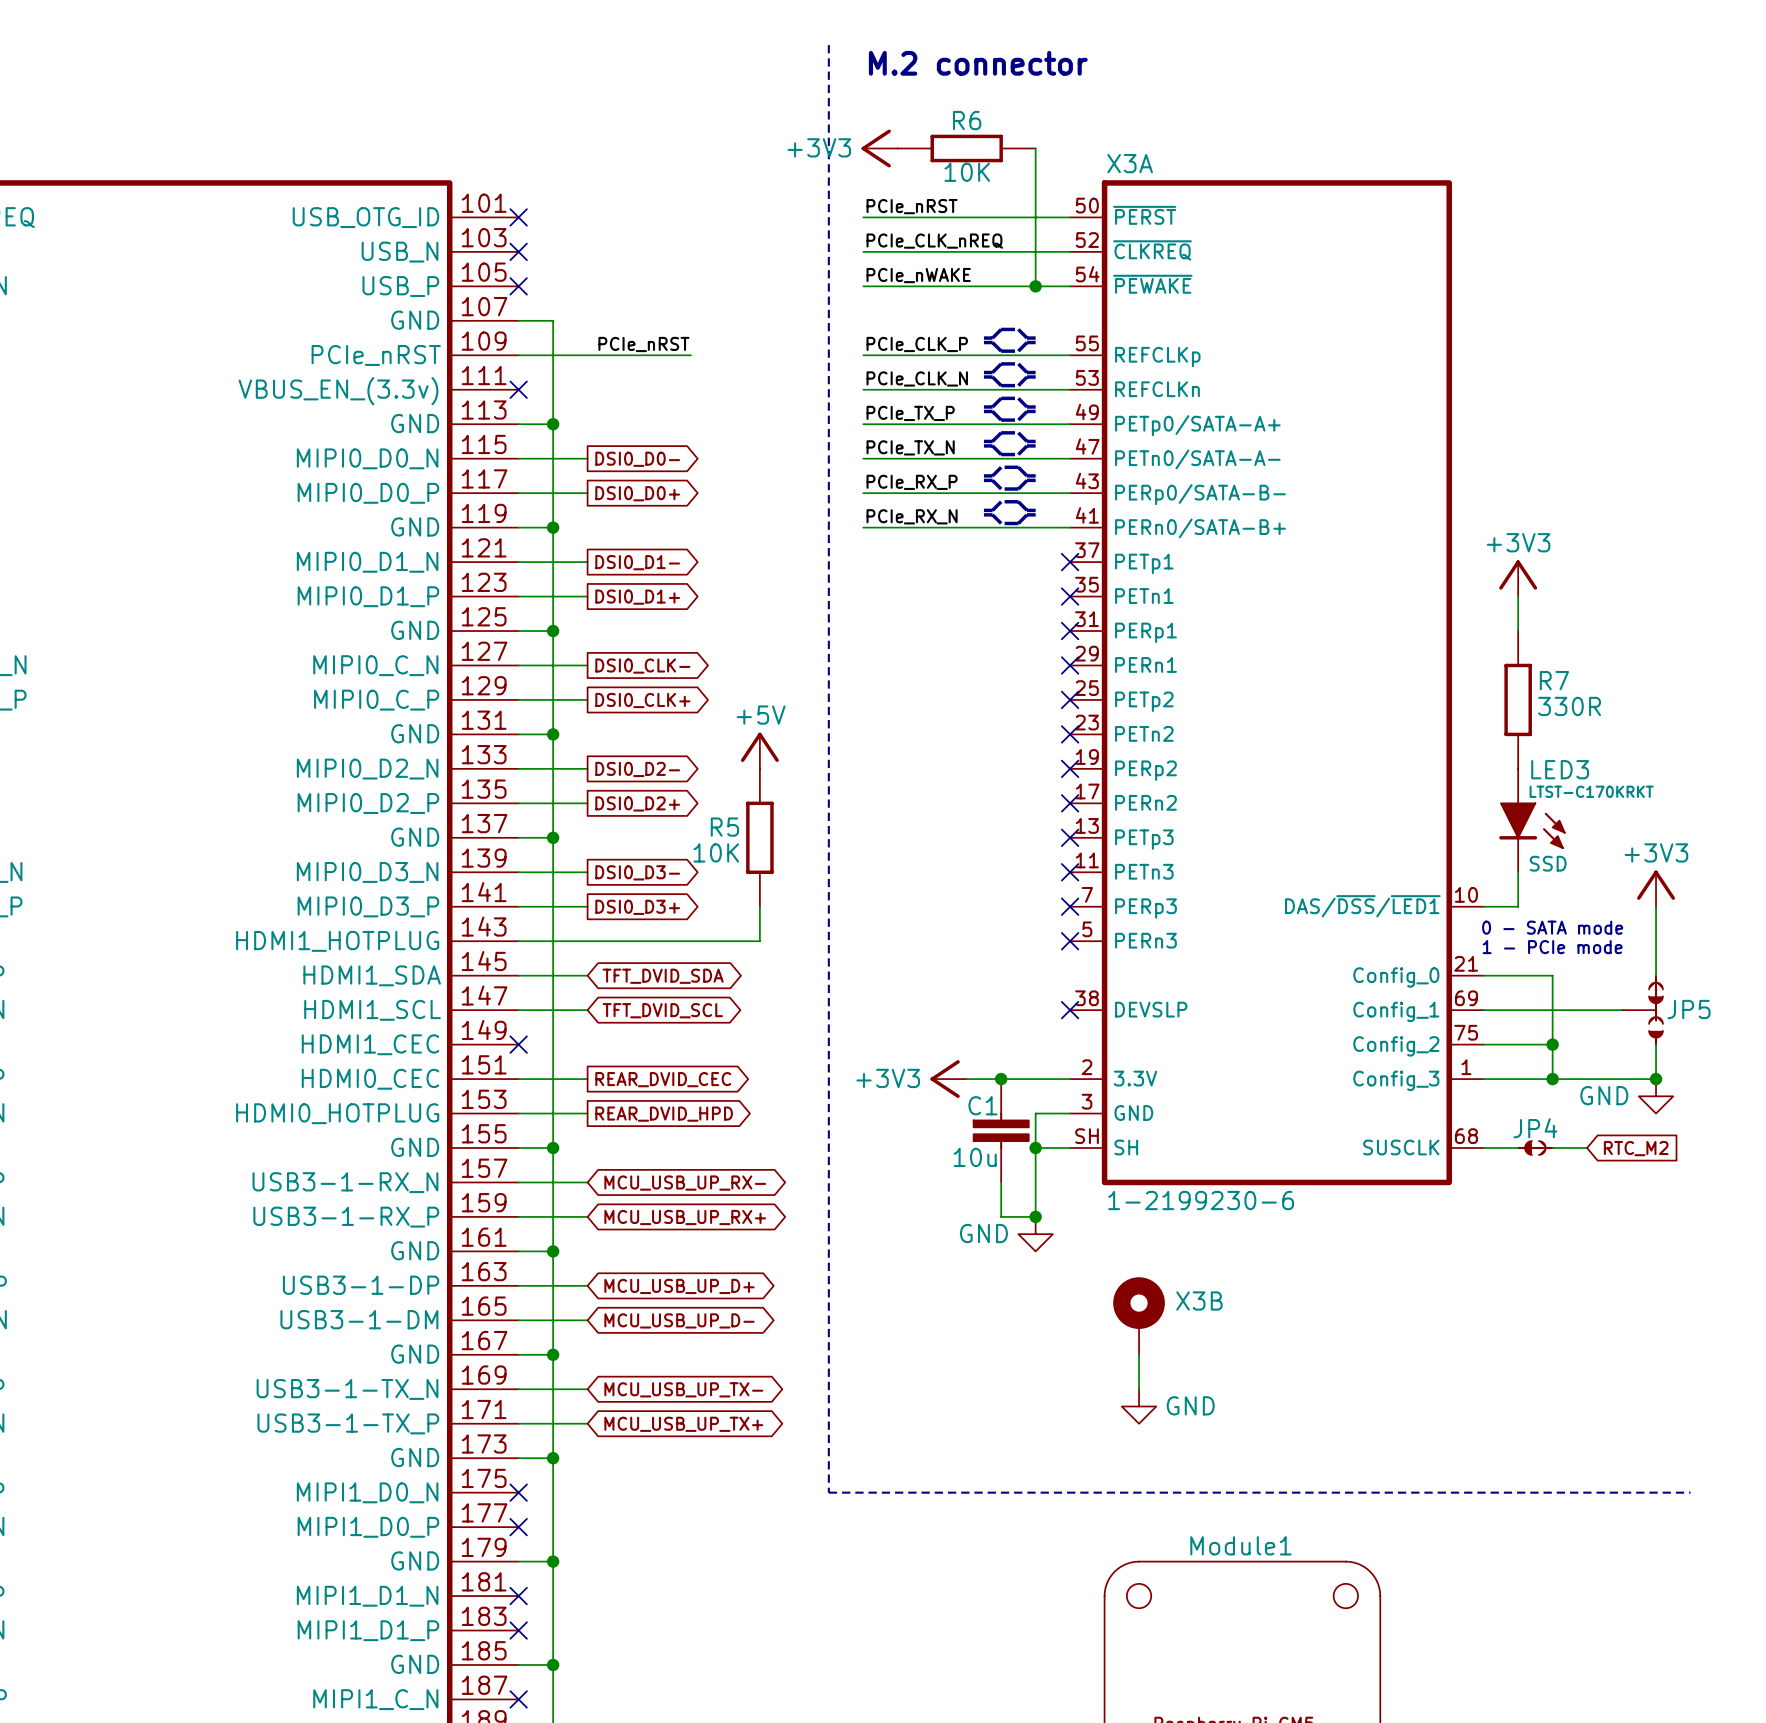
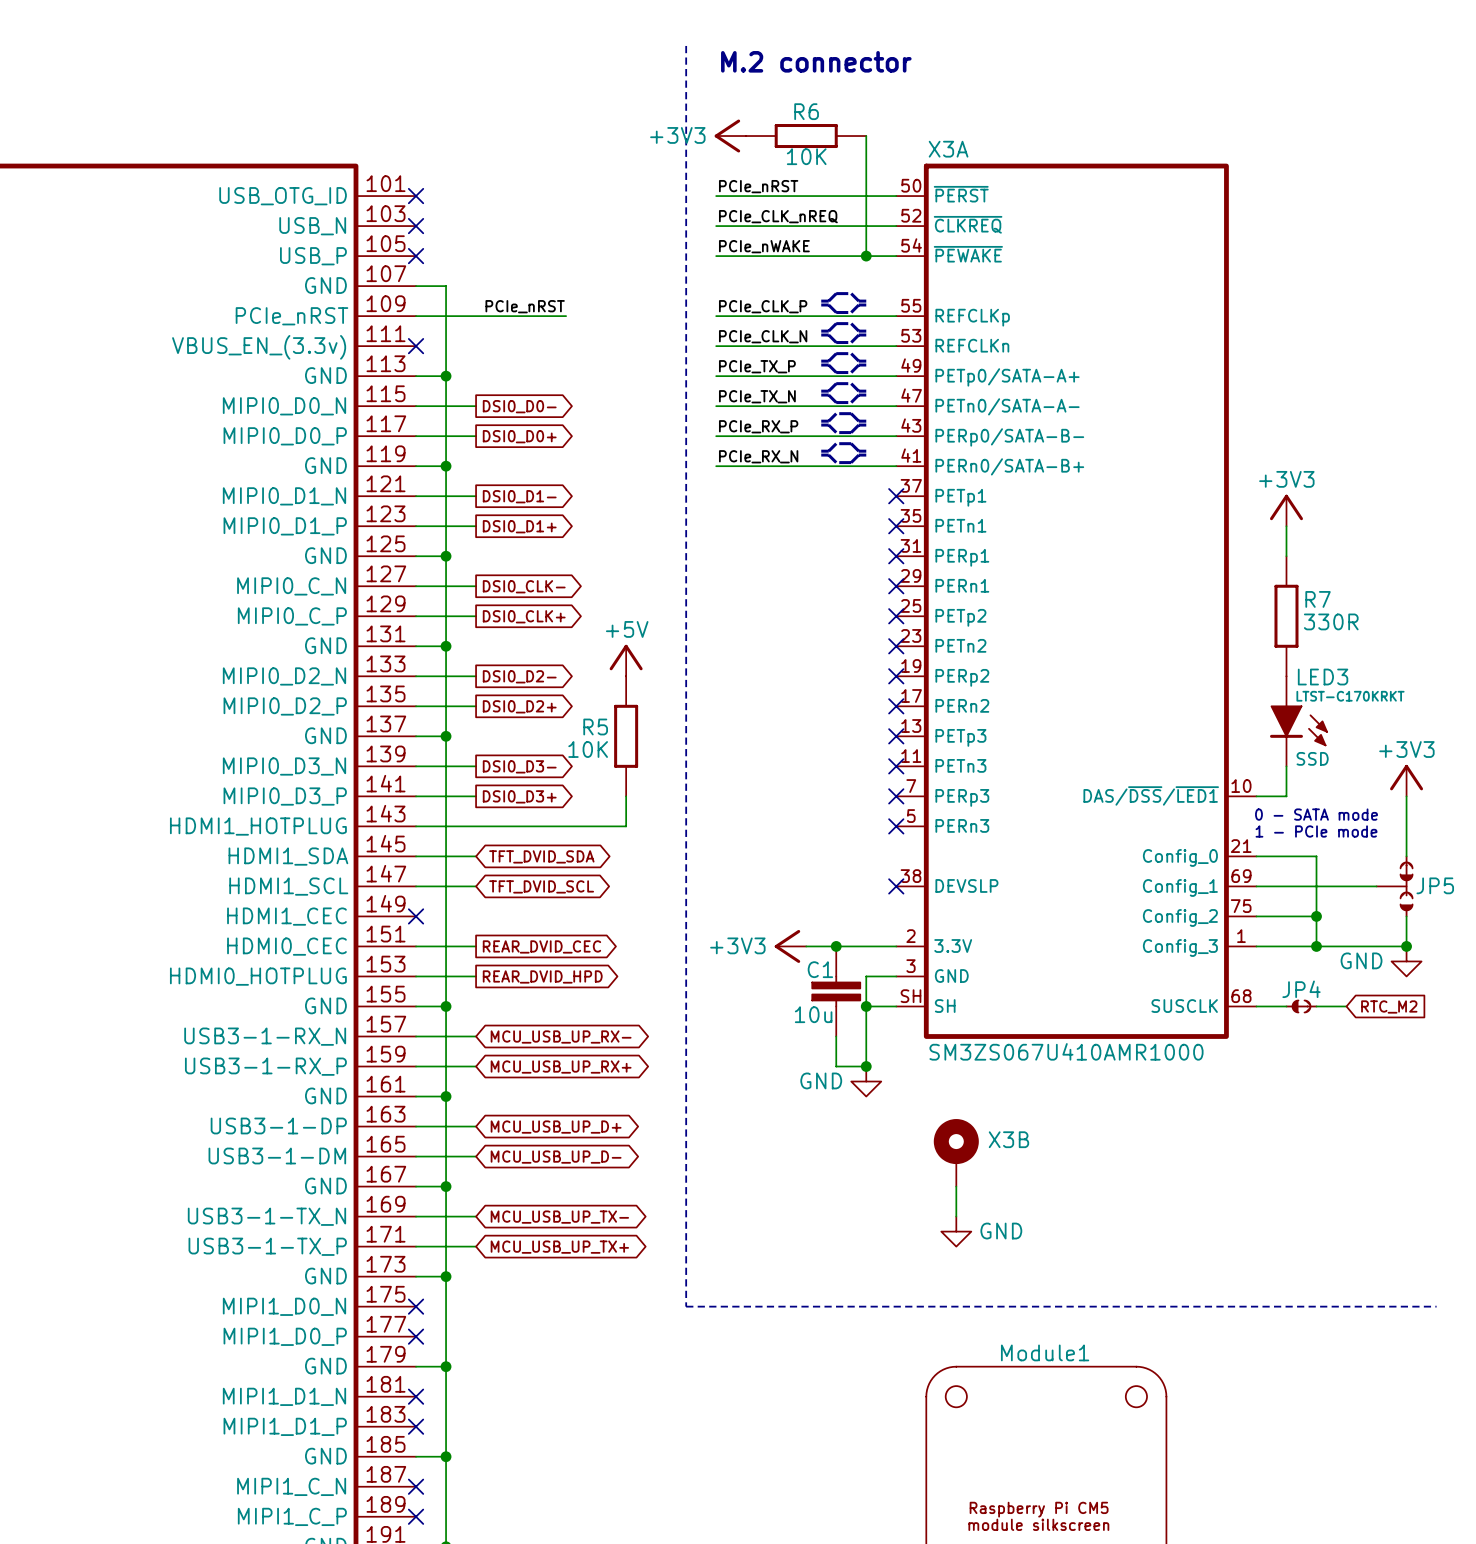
X3A value: 1-2199230-6 (1201, 1200) -> SM3ZS067U410AMR1000 (1066, 1051)

